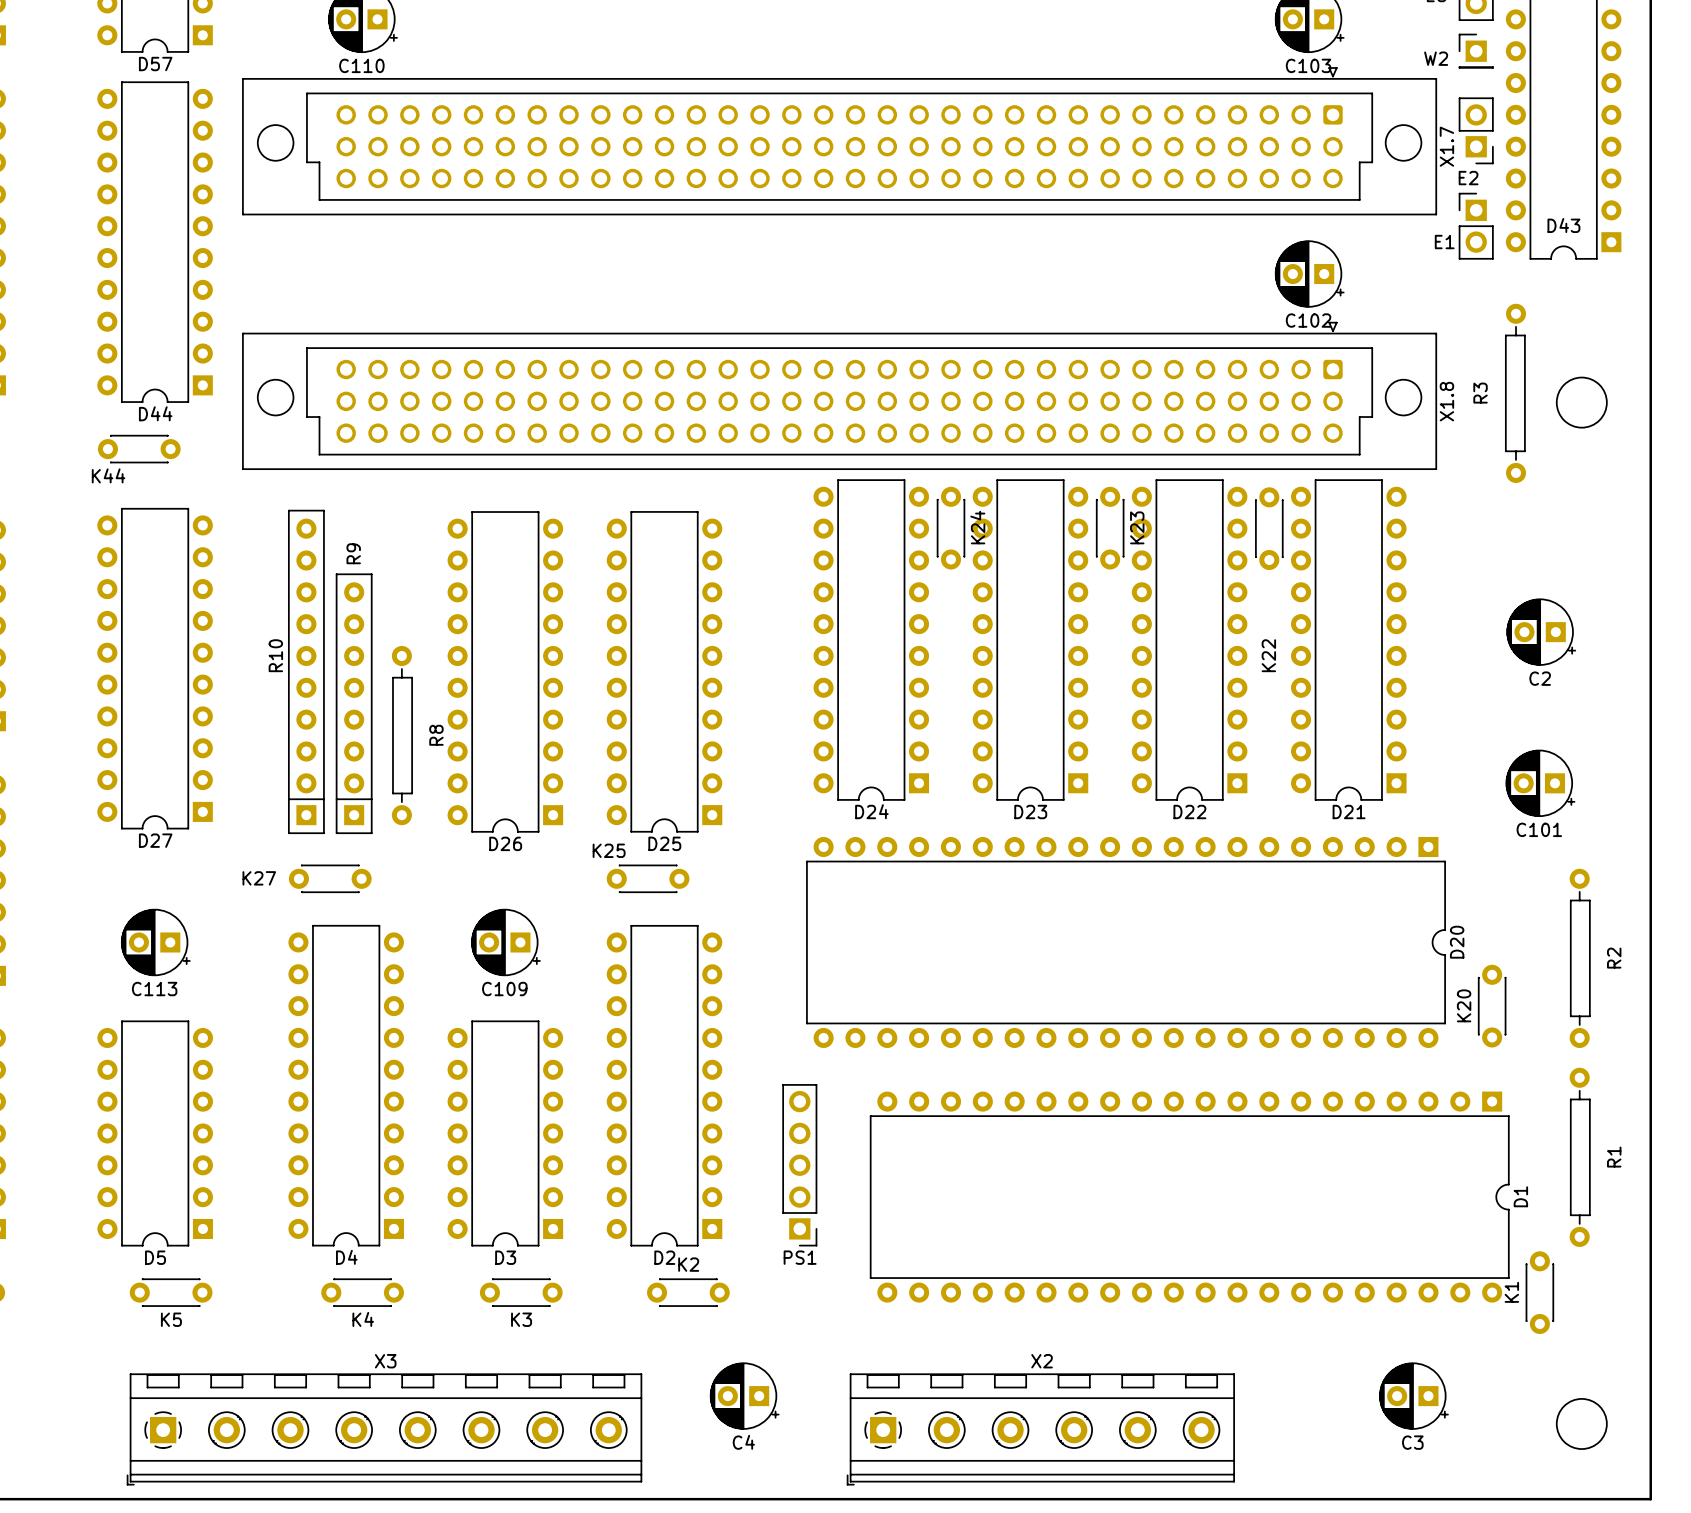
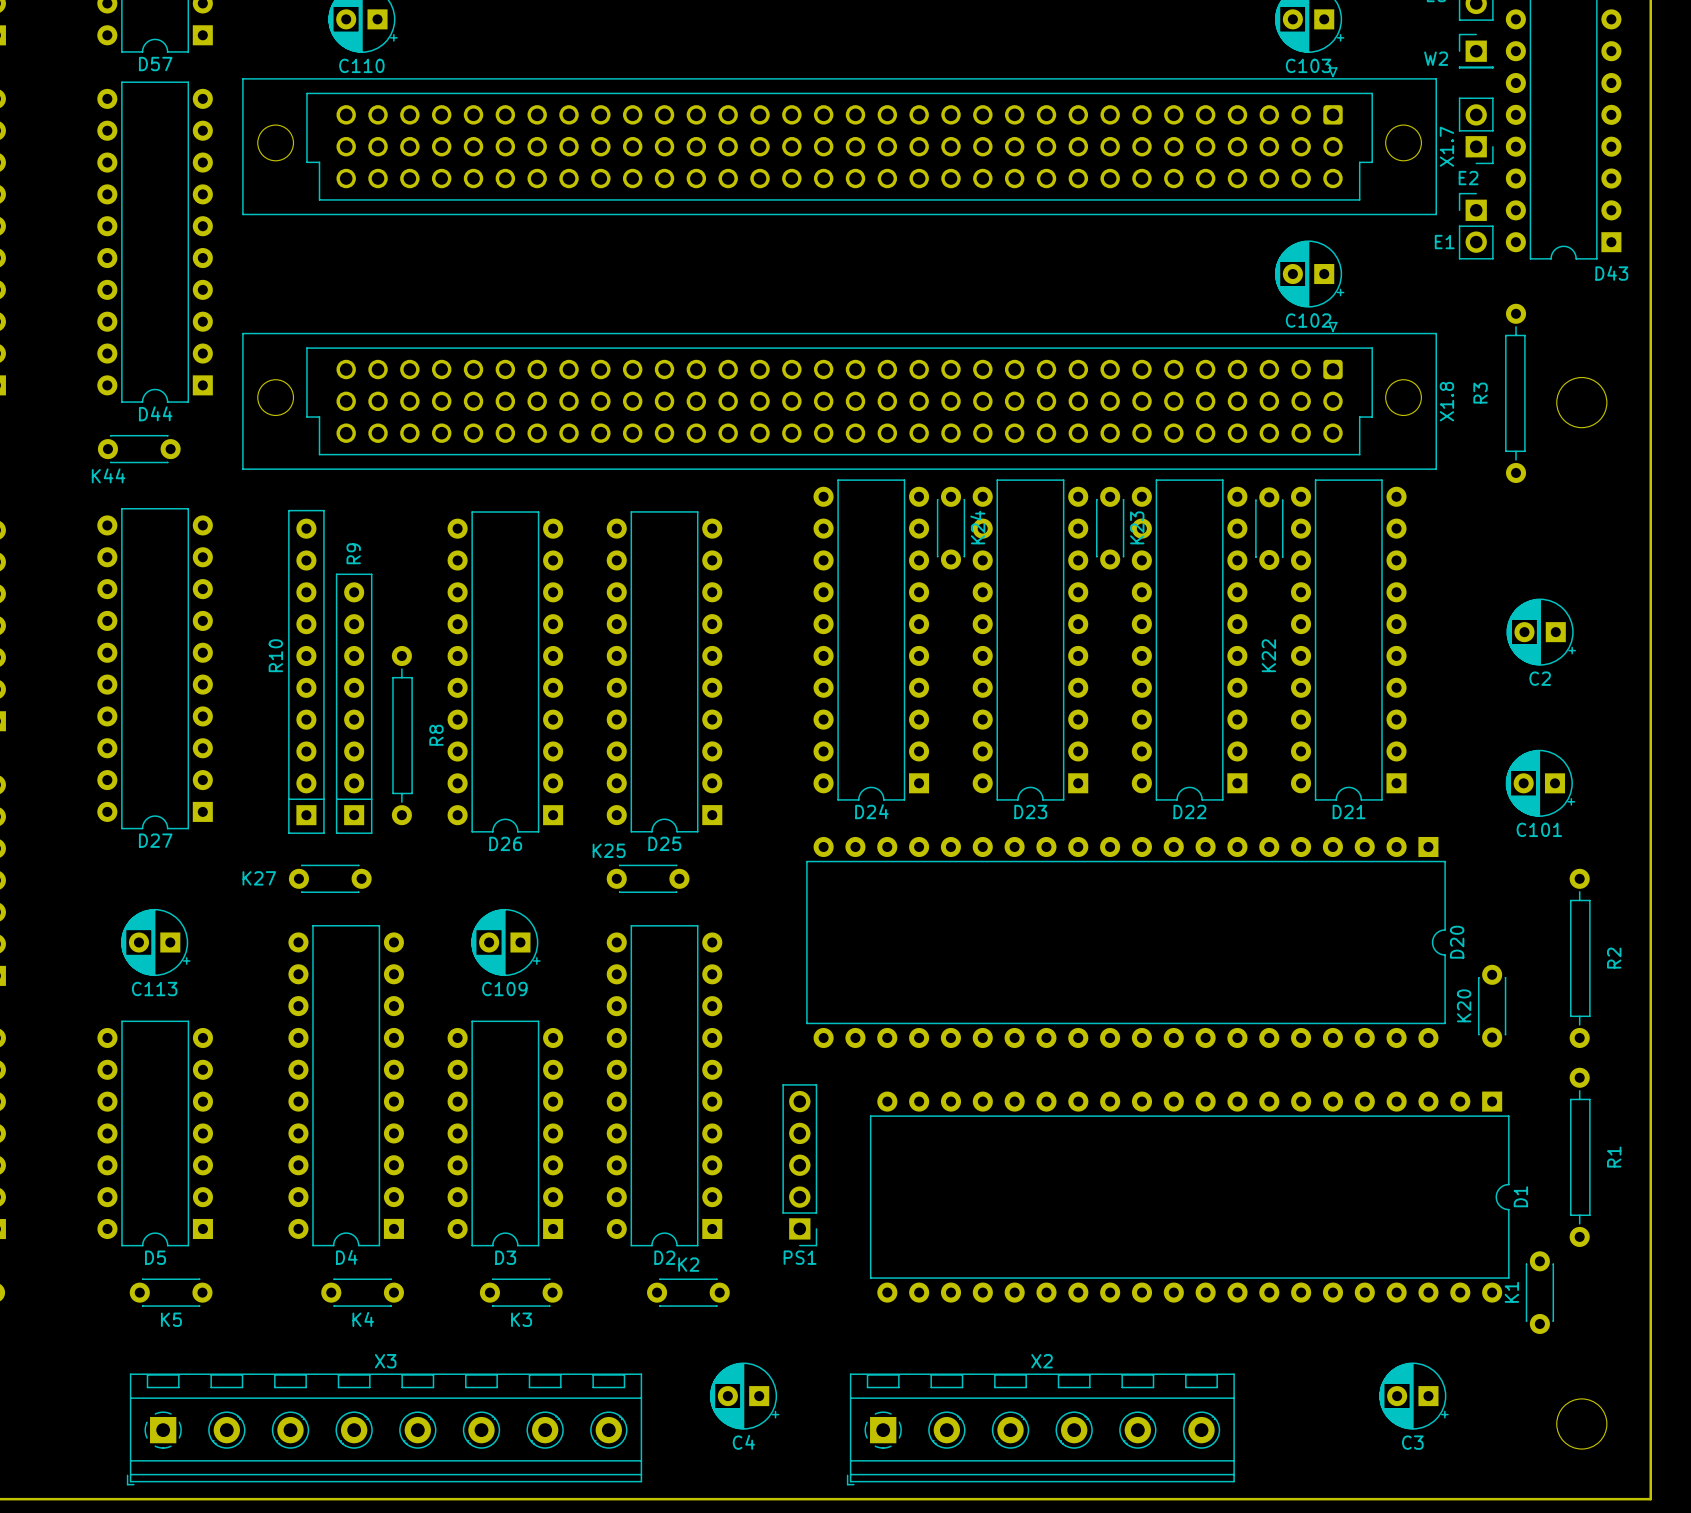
D43 name position: D43 (1563, 225) -> D43 (1611, 273)

